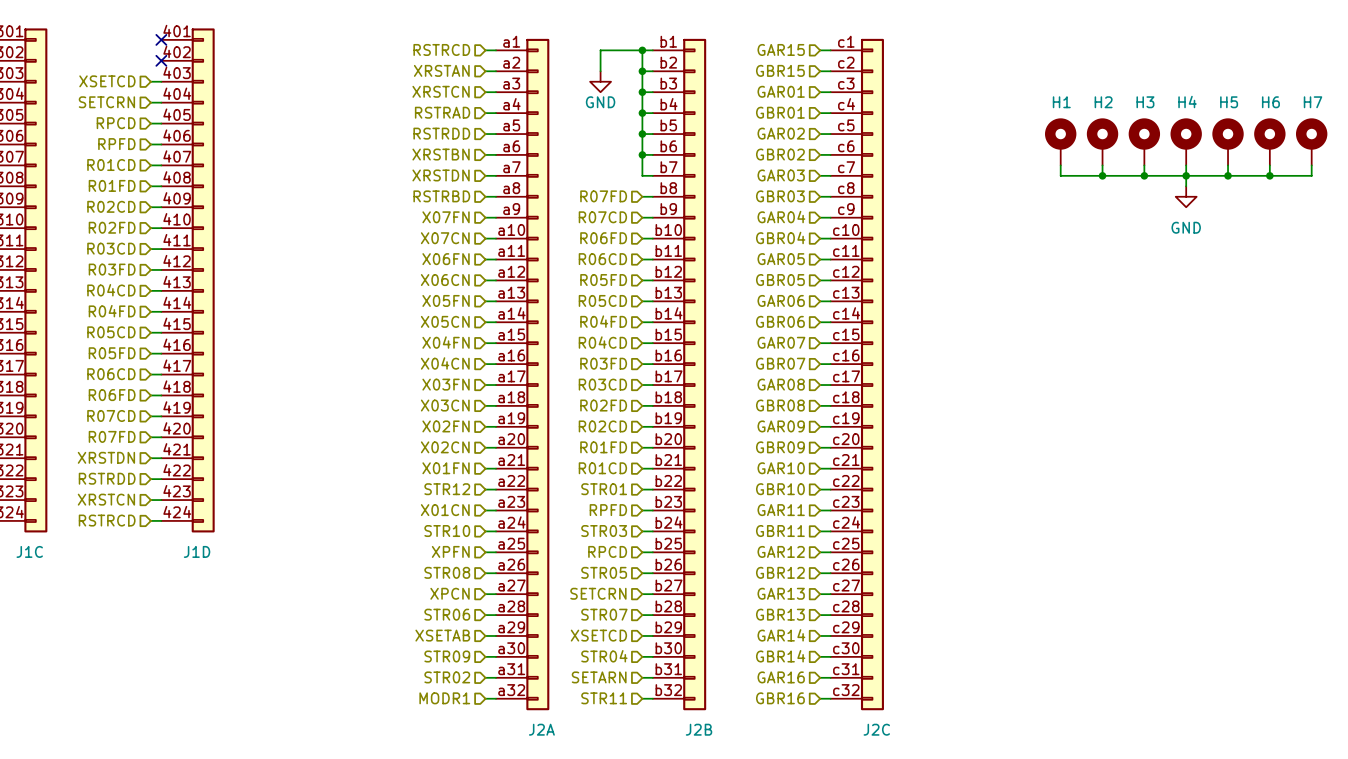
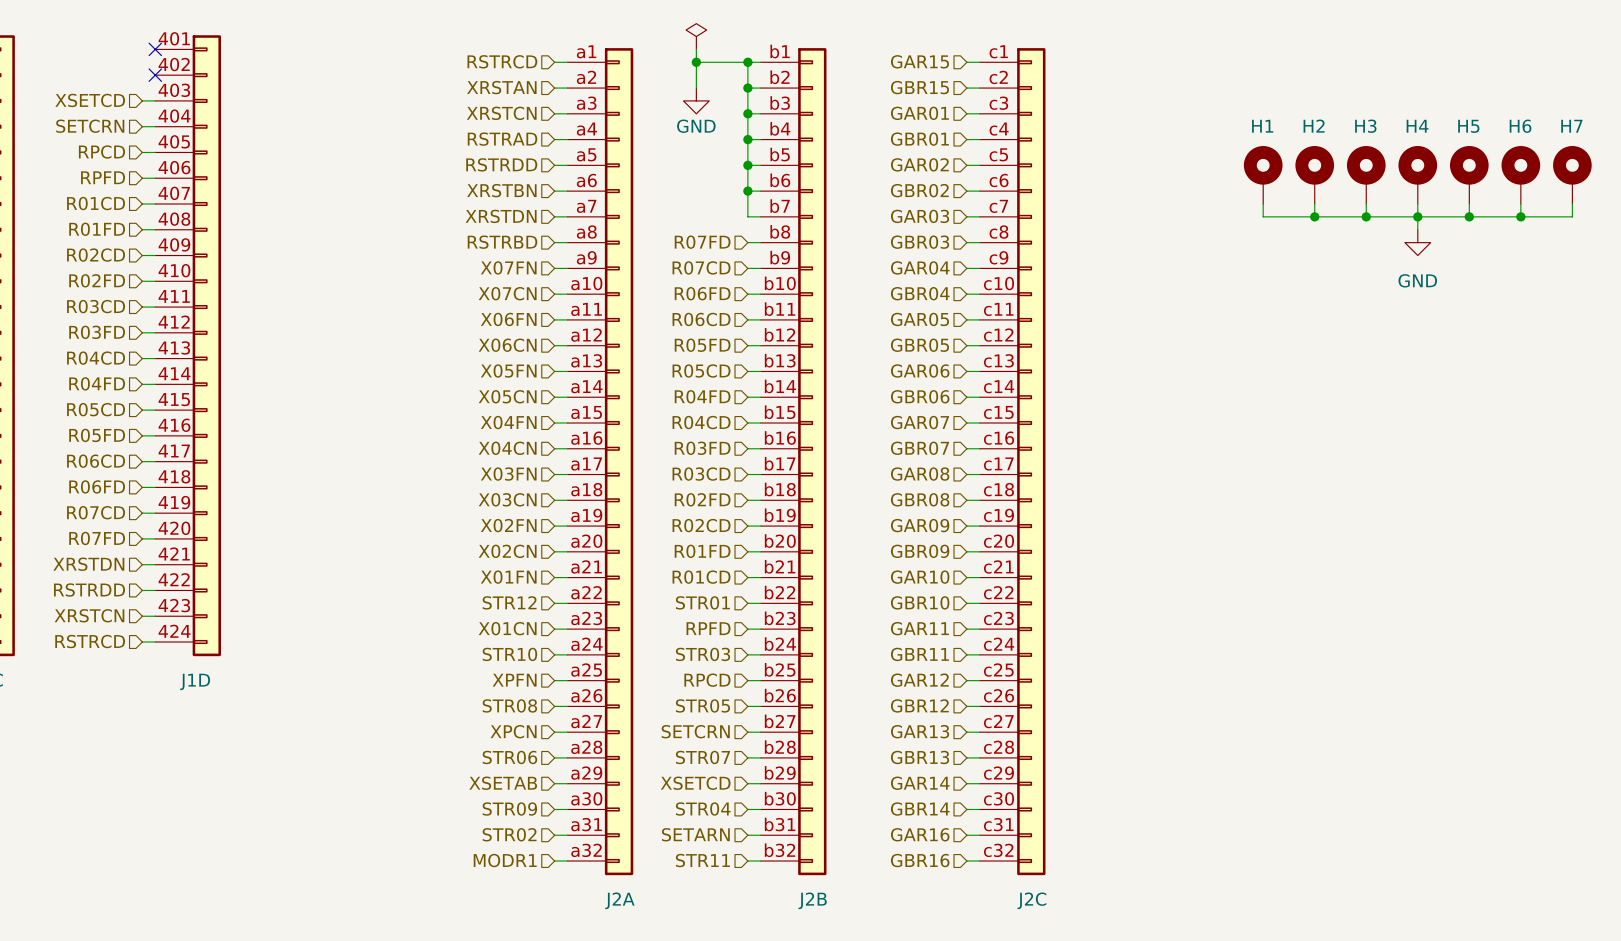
power symbol: none -> (696, 36)
wire: none -> (696, 49) (696, 62)
junction: none -> (696, 62)

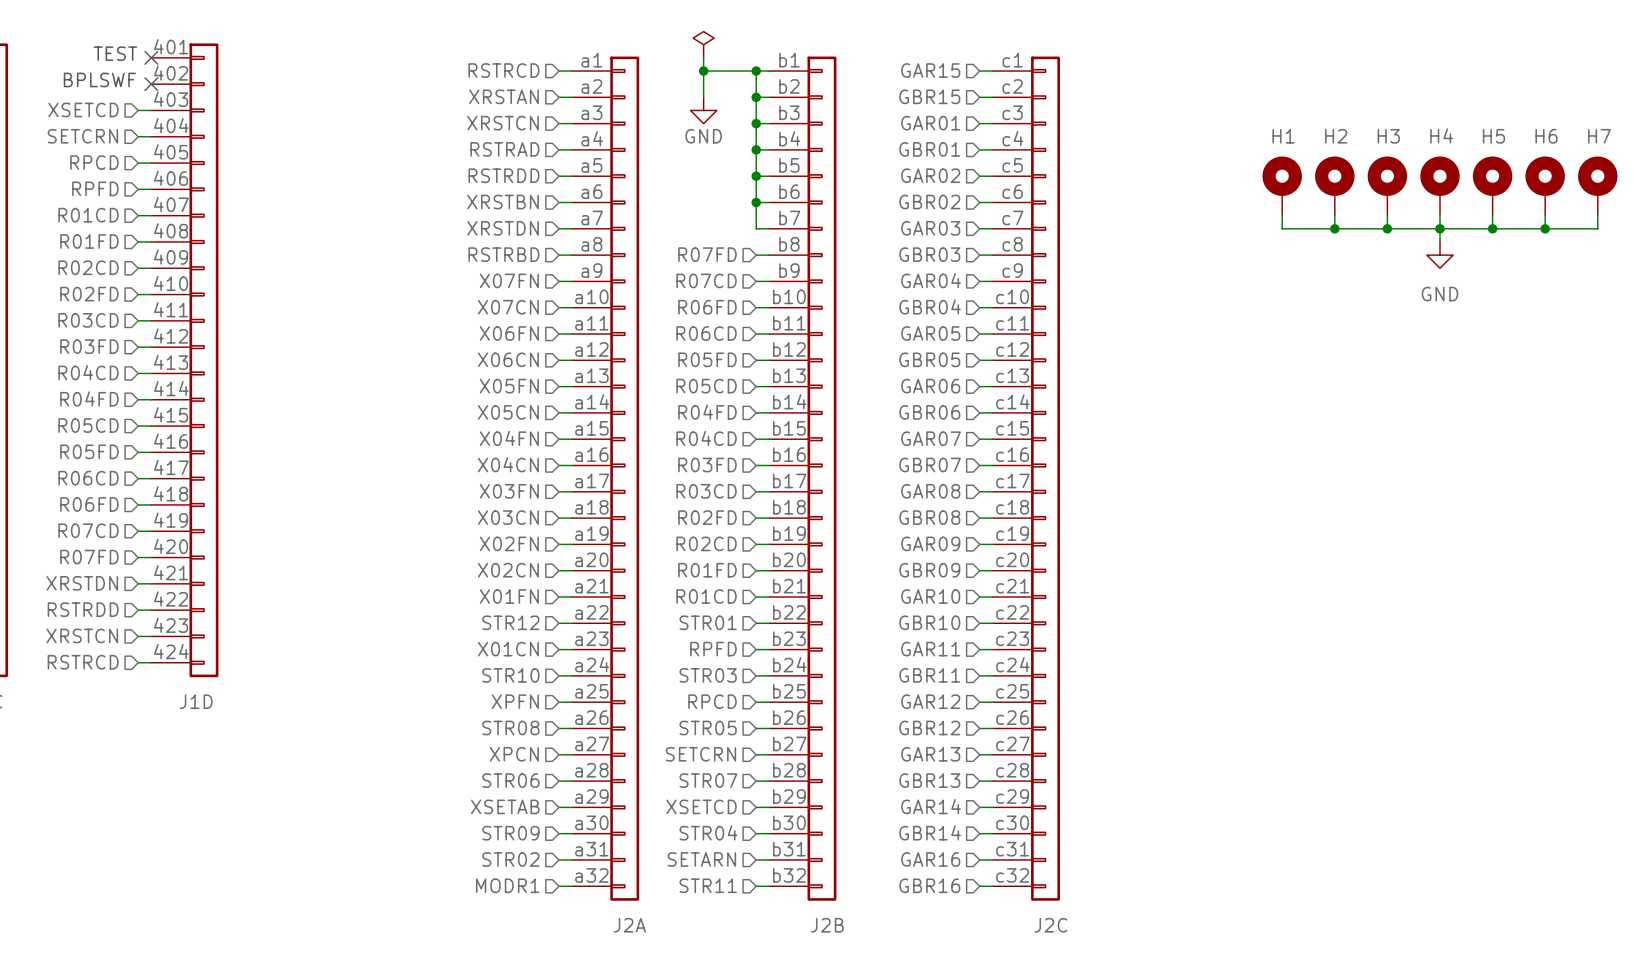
text: none -> TEST (115, 53)
text: none -> BPLSWF (99, 79)

